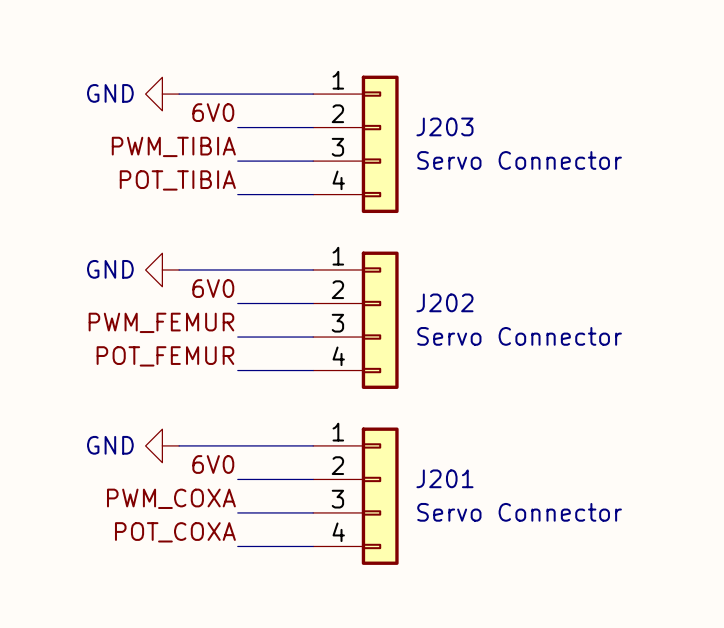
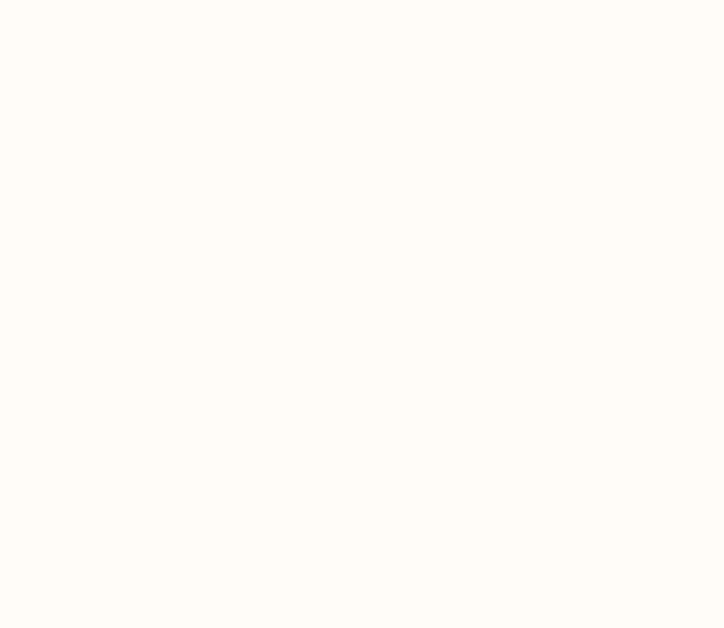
power symbol: GND (162, 94) -> none
wire: (179, 94) (313, 94) -> none
label: 6V0 (213, 112) -> none
wire: (237, 127) (313, 127) -> none
J203: Servo Connector (355, 144) -> none
label: PWM_TIBIA (173, 146) -> none
wire: (237, 161) (313, 161) -> none
label: POT_TIBIA (177, 180) -> none
wire: (237, 194) (313, 194) -> none
power symbol: GND (162, 269) -> none
wire: (179, 269) (313, 269) -> none
label: 6V0 (213, 288) -> none
wire: (237, 303) (313, 303) -> none
J202: Servo Connector (355, 320) -> none
label: PWM_FEMUR (161, 322) -> none
wire: (237, 337) (313, 337) -> none
label: POT_FEMUR (165, 356) -> none
wire: (237, 370) (313, 370) -> none
power symbol: GND (162, 445) -> none
wire: (179, 445) (313, 445) -> none
label: 6V0 (213, 464) -> none
wire: (237, 479) (313, 479) -> none
J201: Servo Connector (355, 496) -> none
label: PWM_COXA (171, 498) -> none
wire: (237, 512) (313, 512) -> none
label: POT_COXA (175, 532) -> none
wire: (237, 546) (313, 546) -> none

